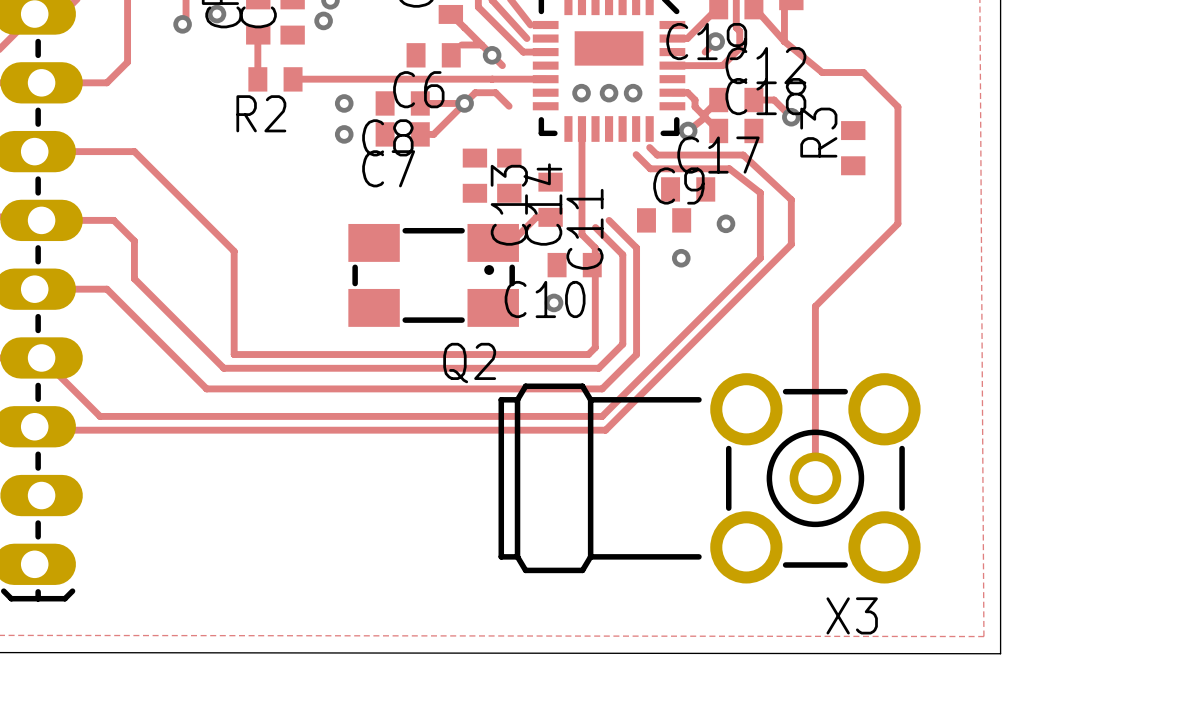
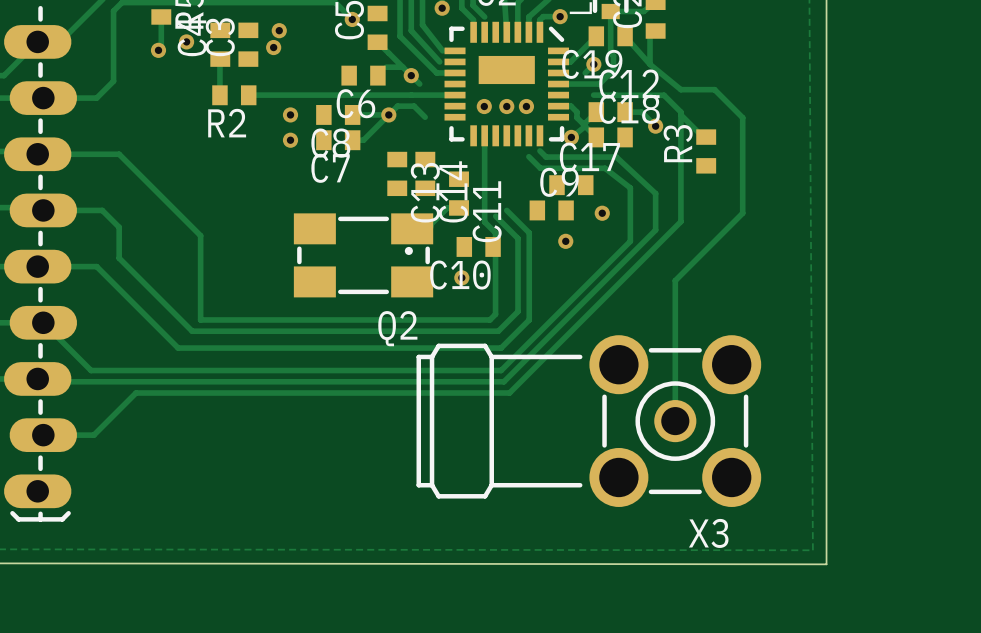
track: none -> (593, 95) (664, 95) (680, 112) (680, 221) (509, 393) (136, 393) (93, 435) (43, 435)
track: none -> (680, 114) (703, 137)

